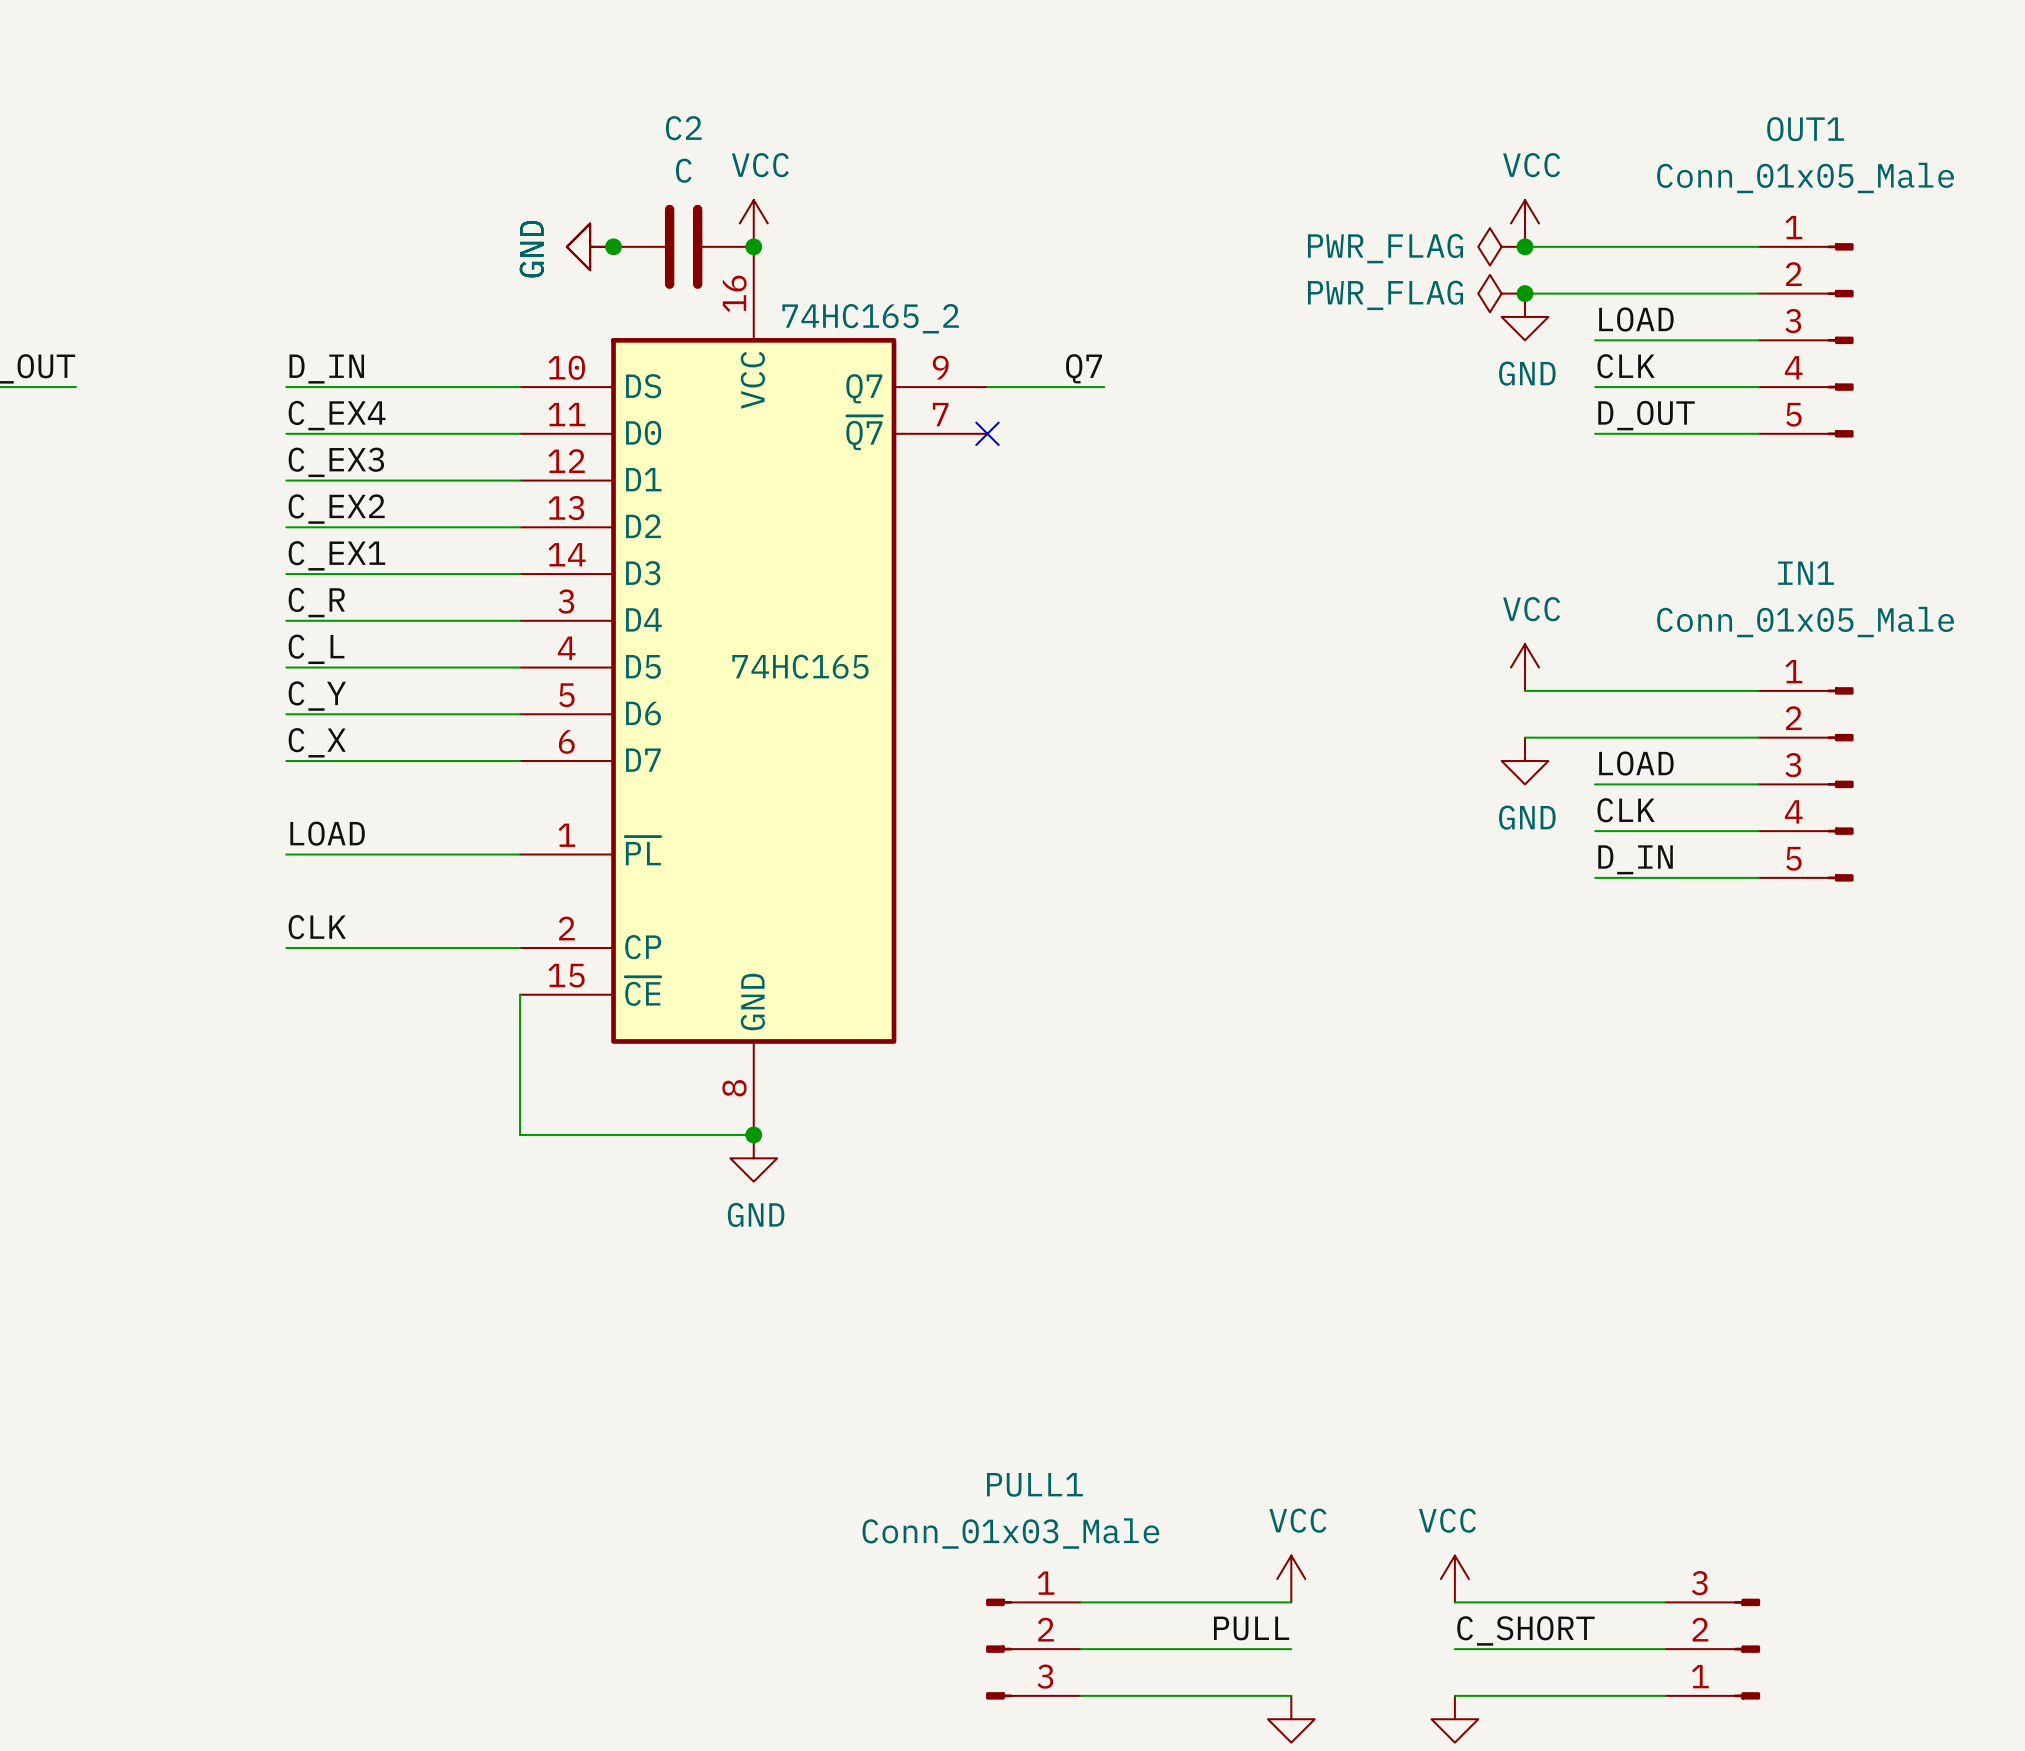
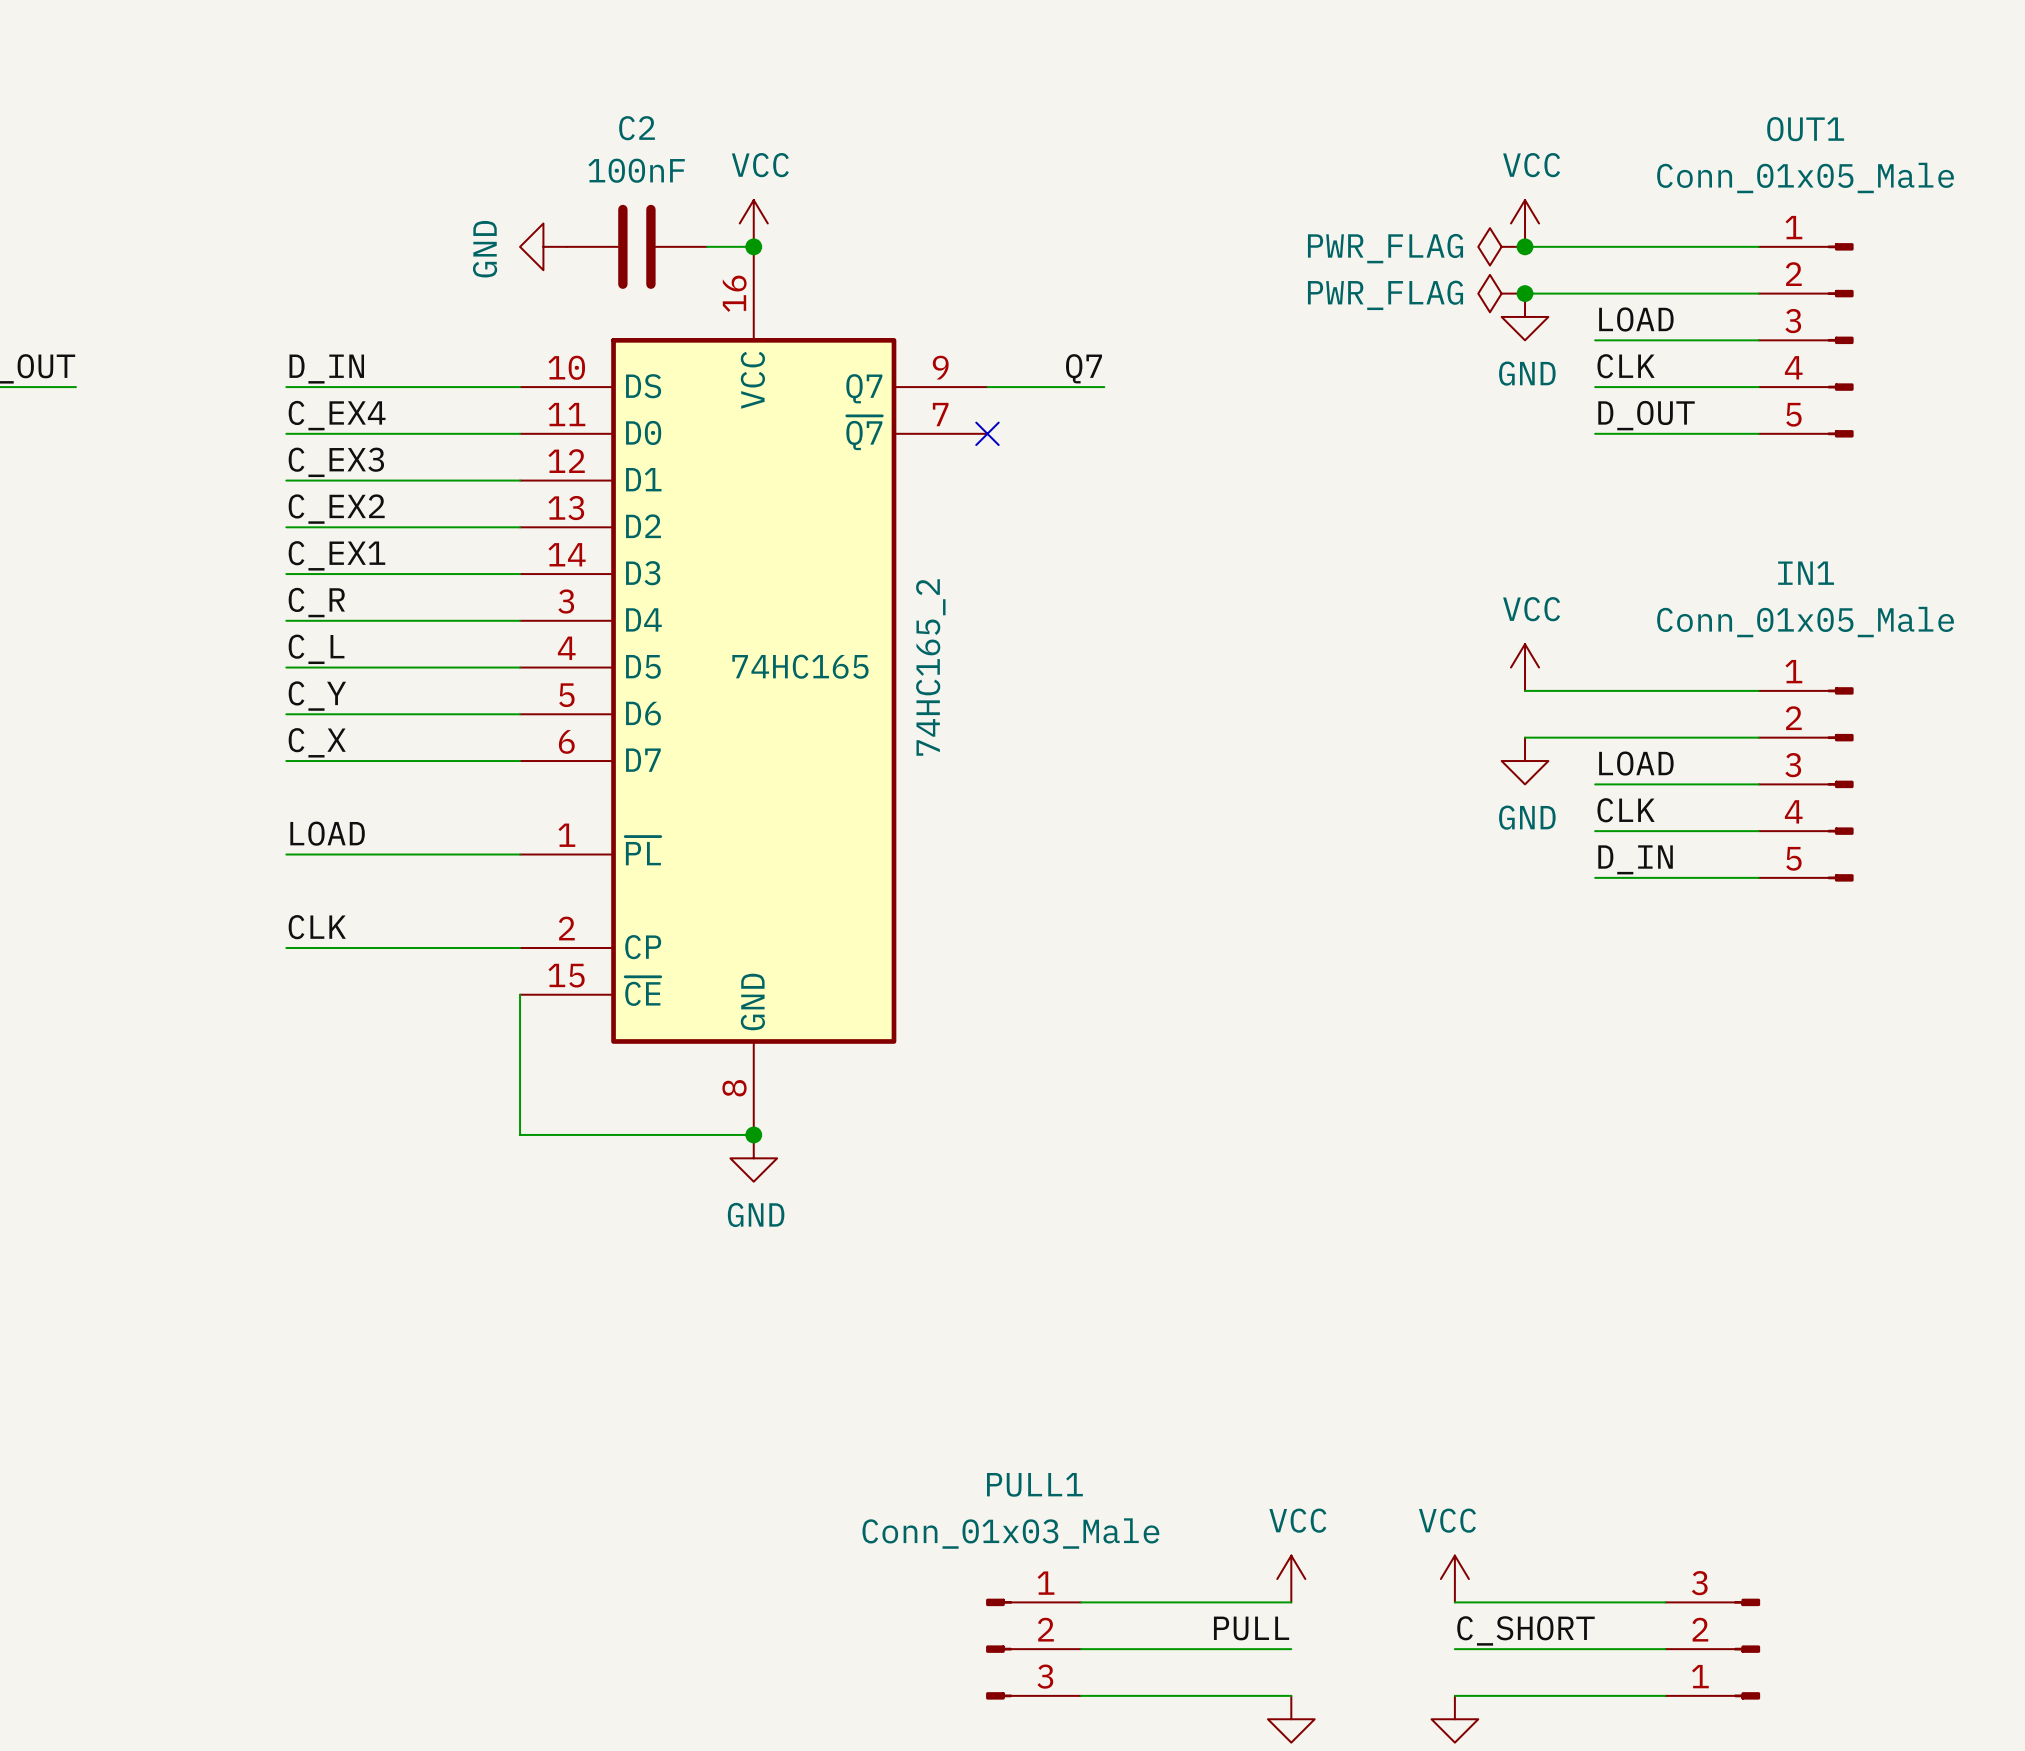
C2 value: C (683, 170) -> 100nF (636, 170)
power symbol position: GND (590, 246) -> GND (543, 246)
junction: (613, 246) -> none
C2 position: (683, 246) -> (636, 246)
74HC165_2 name rotation: 0° (870, 318) -> 90° counterclockwise (930, 667)
74HC165_2 name position: 74HC165_2 (870, 318) -> 74HC165_2 (930, 667)

